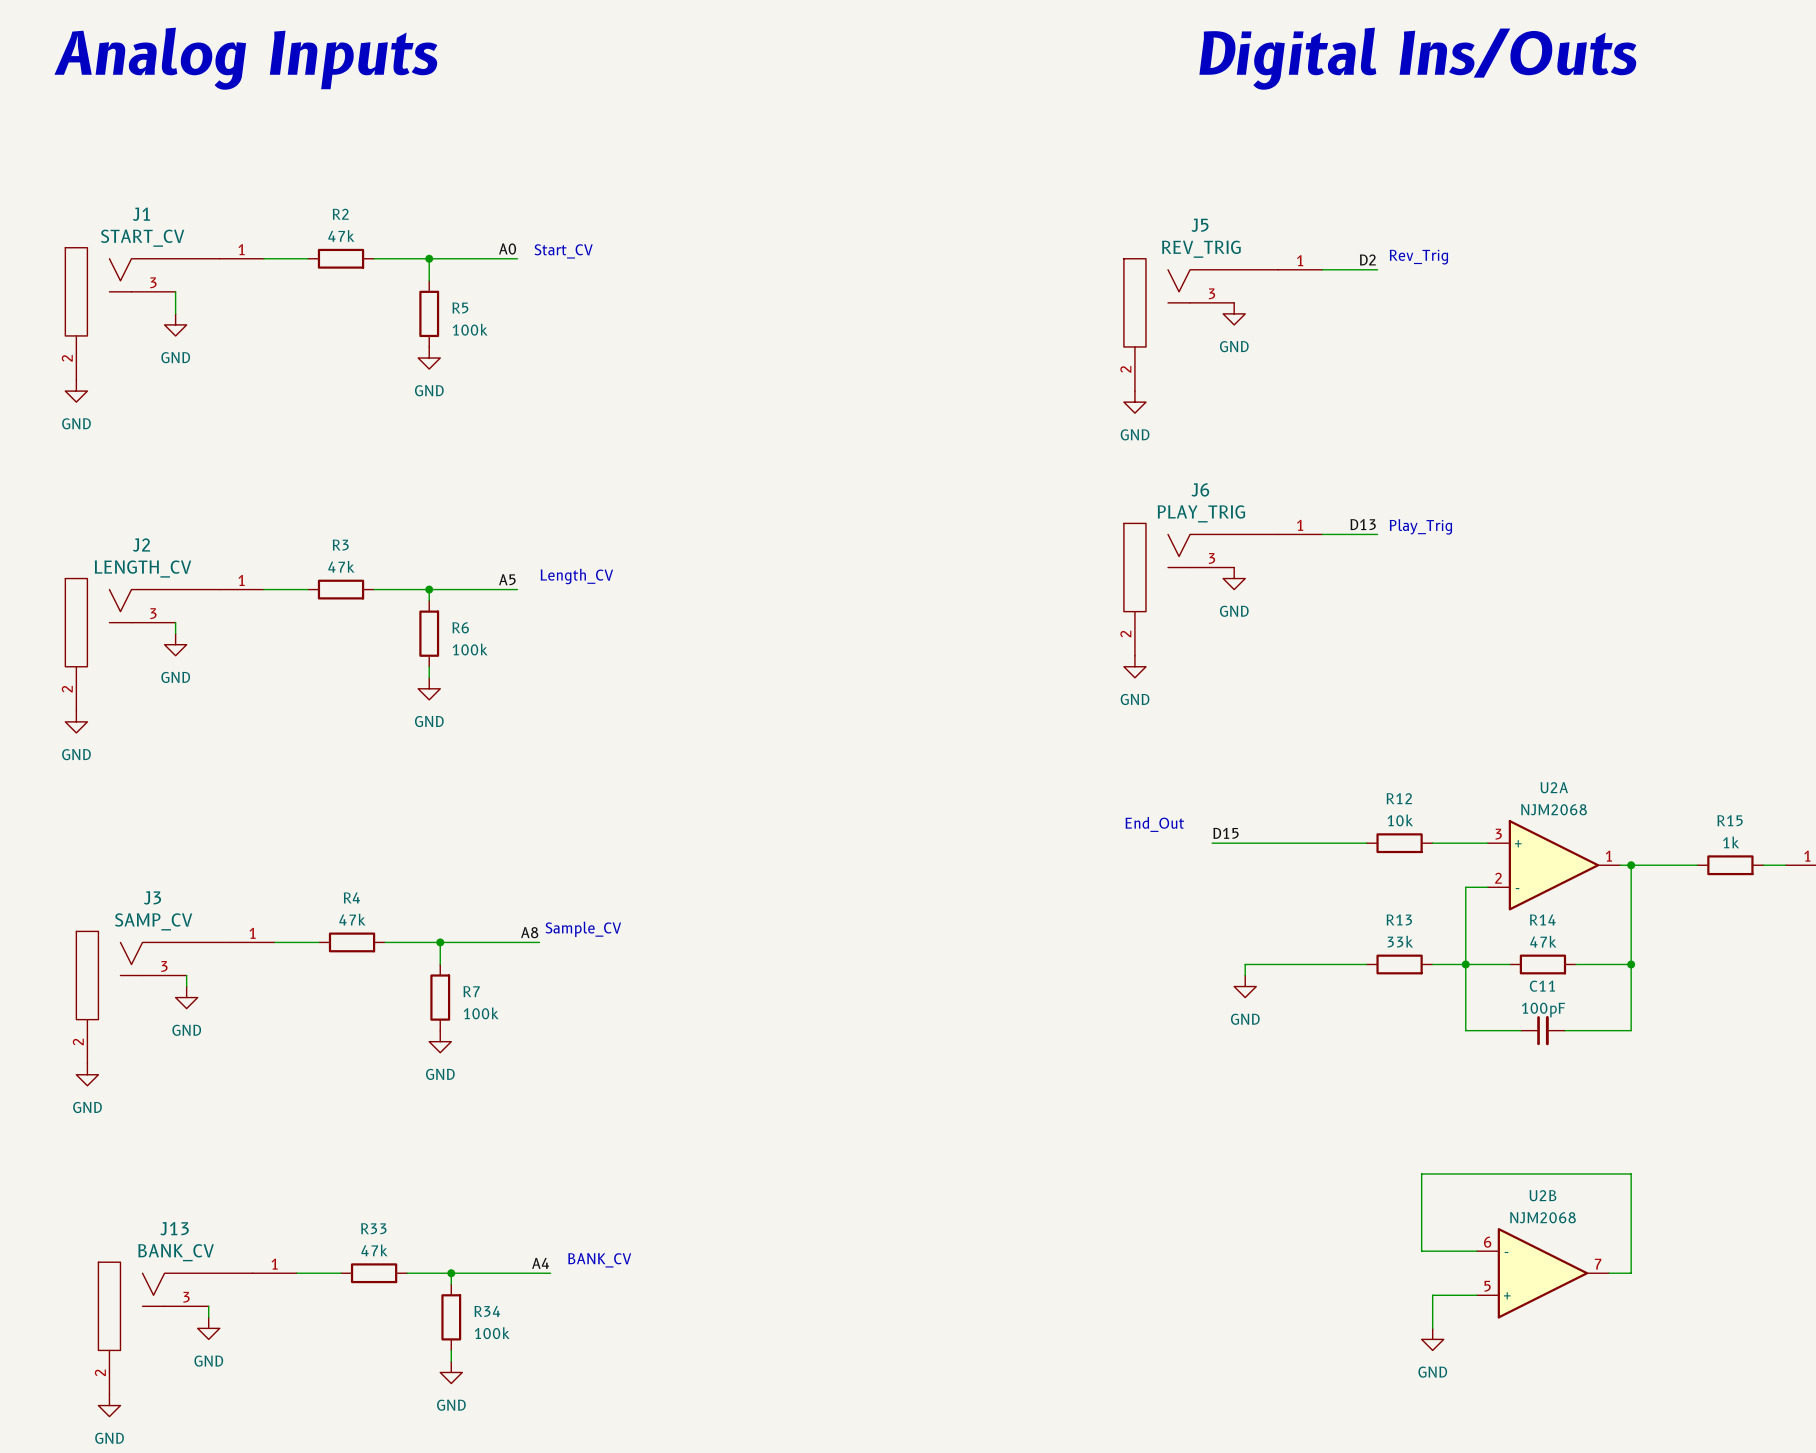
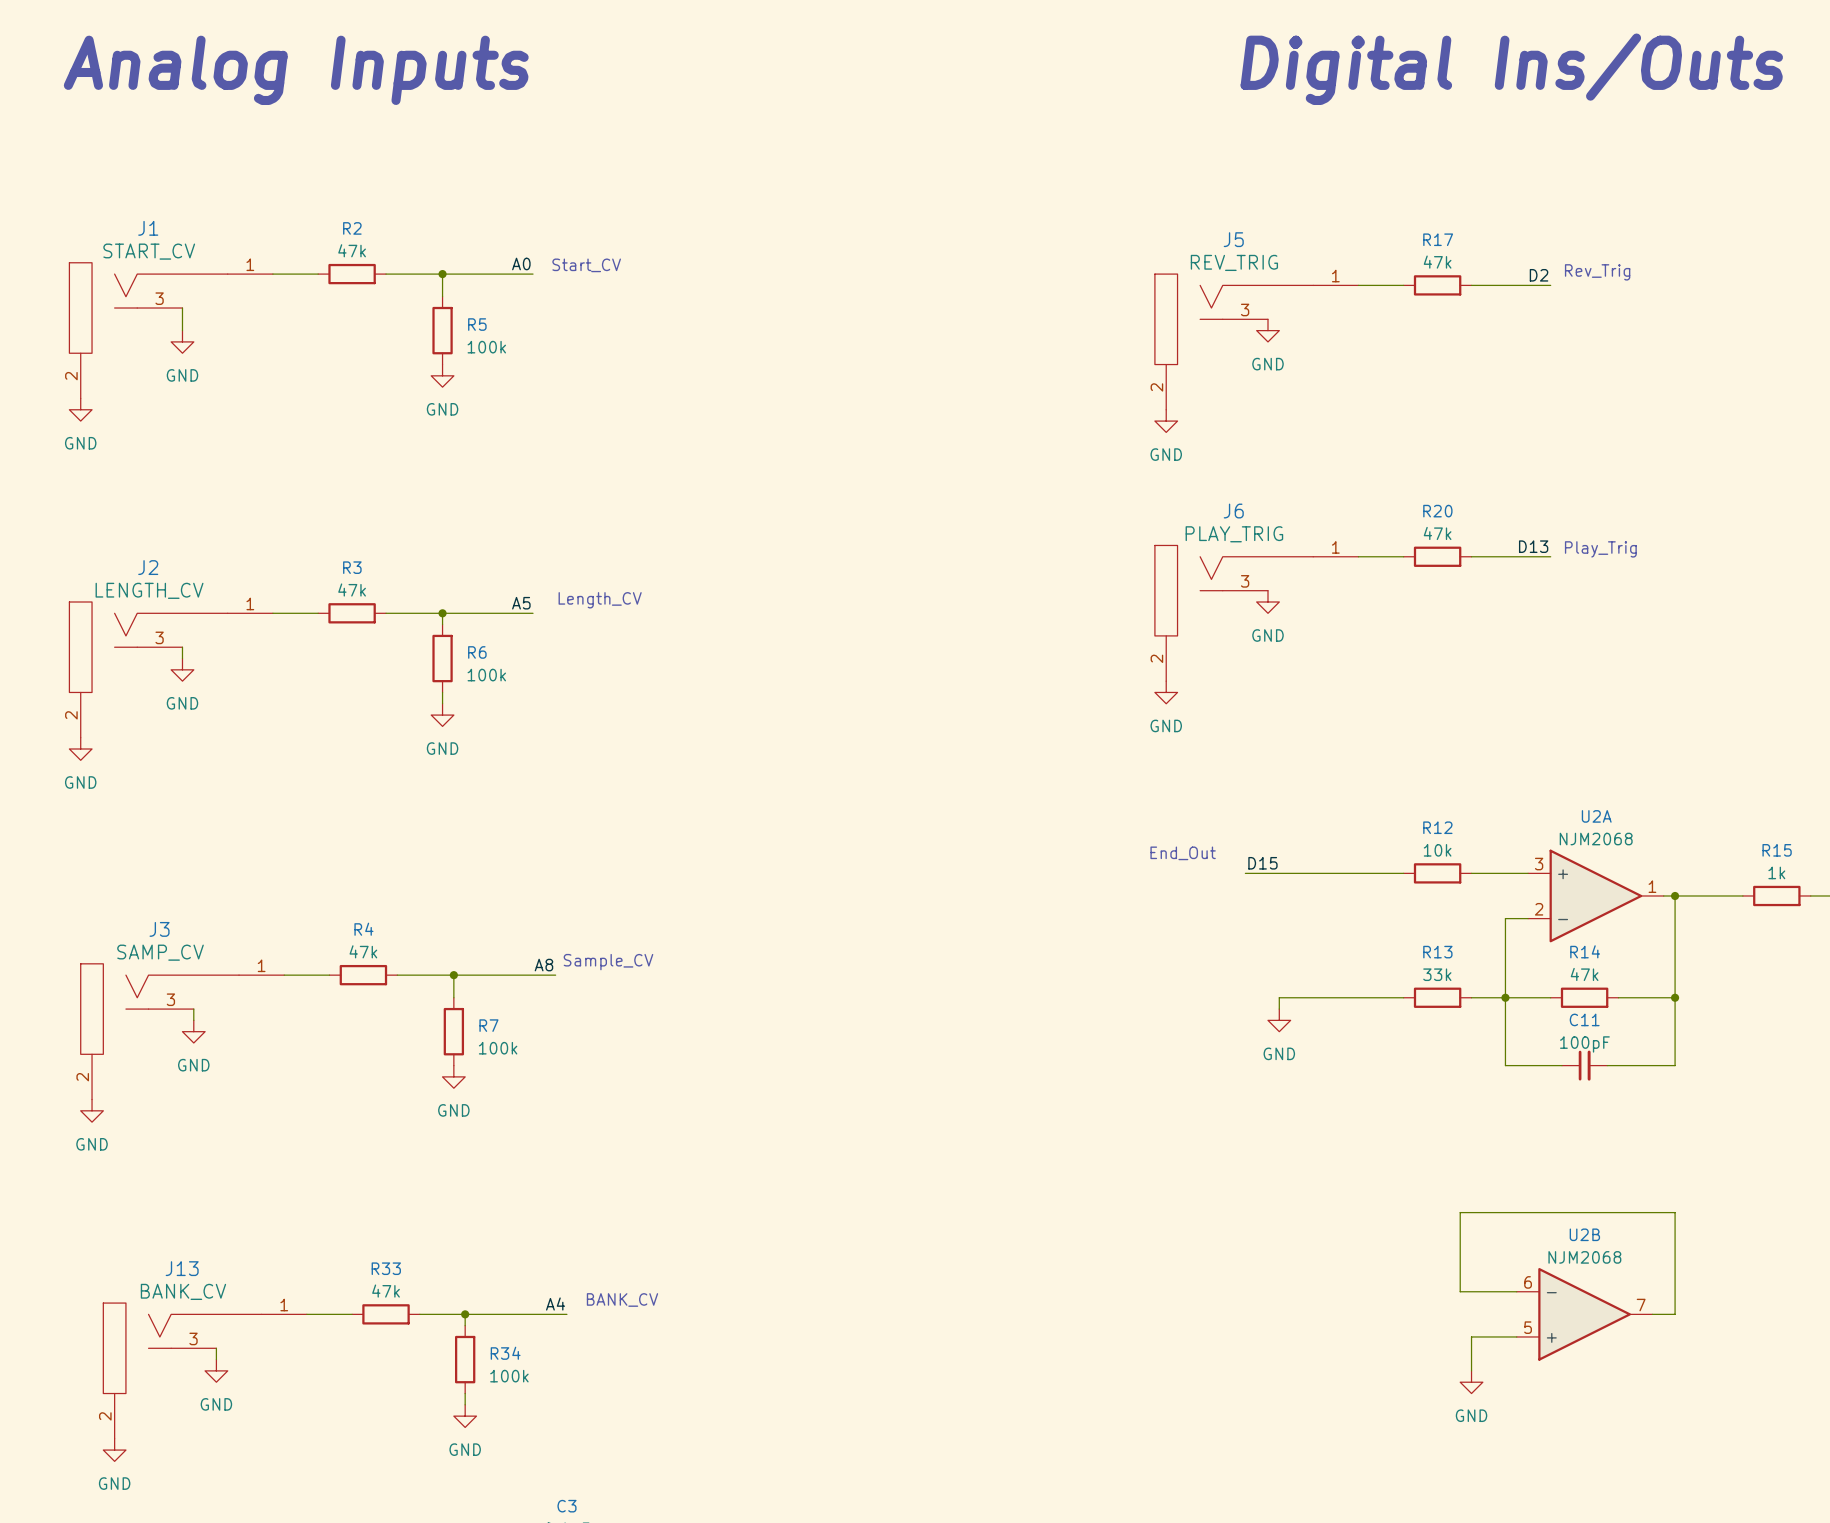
text position: Rev_Trig (1418, 257) -> Rev_Trig (1597, 272)
label position: D2 (1367, 259) -> D2 (1539, 275)
R17: none -> (1437, 285)
wire: none -> (1471, 285) (1550, 285)
label position: D13 (1363, 524) -> D13 (1533, 546)
text position: Play_Trig (1420, 526) -> Play_Trig (1600, 549)
R20: none -> (1437, 556)
wire: none -> (1471, 556) (1550, 556)

